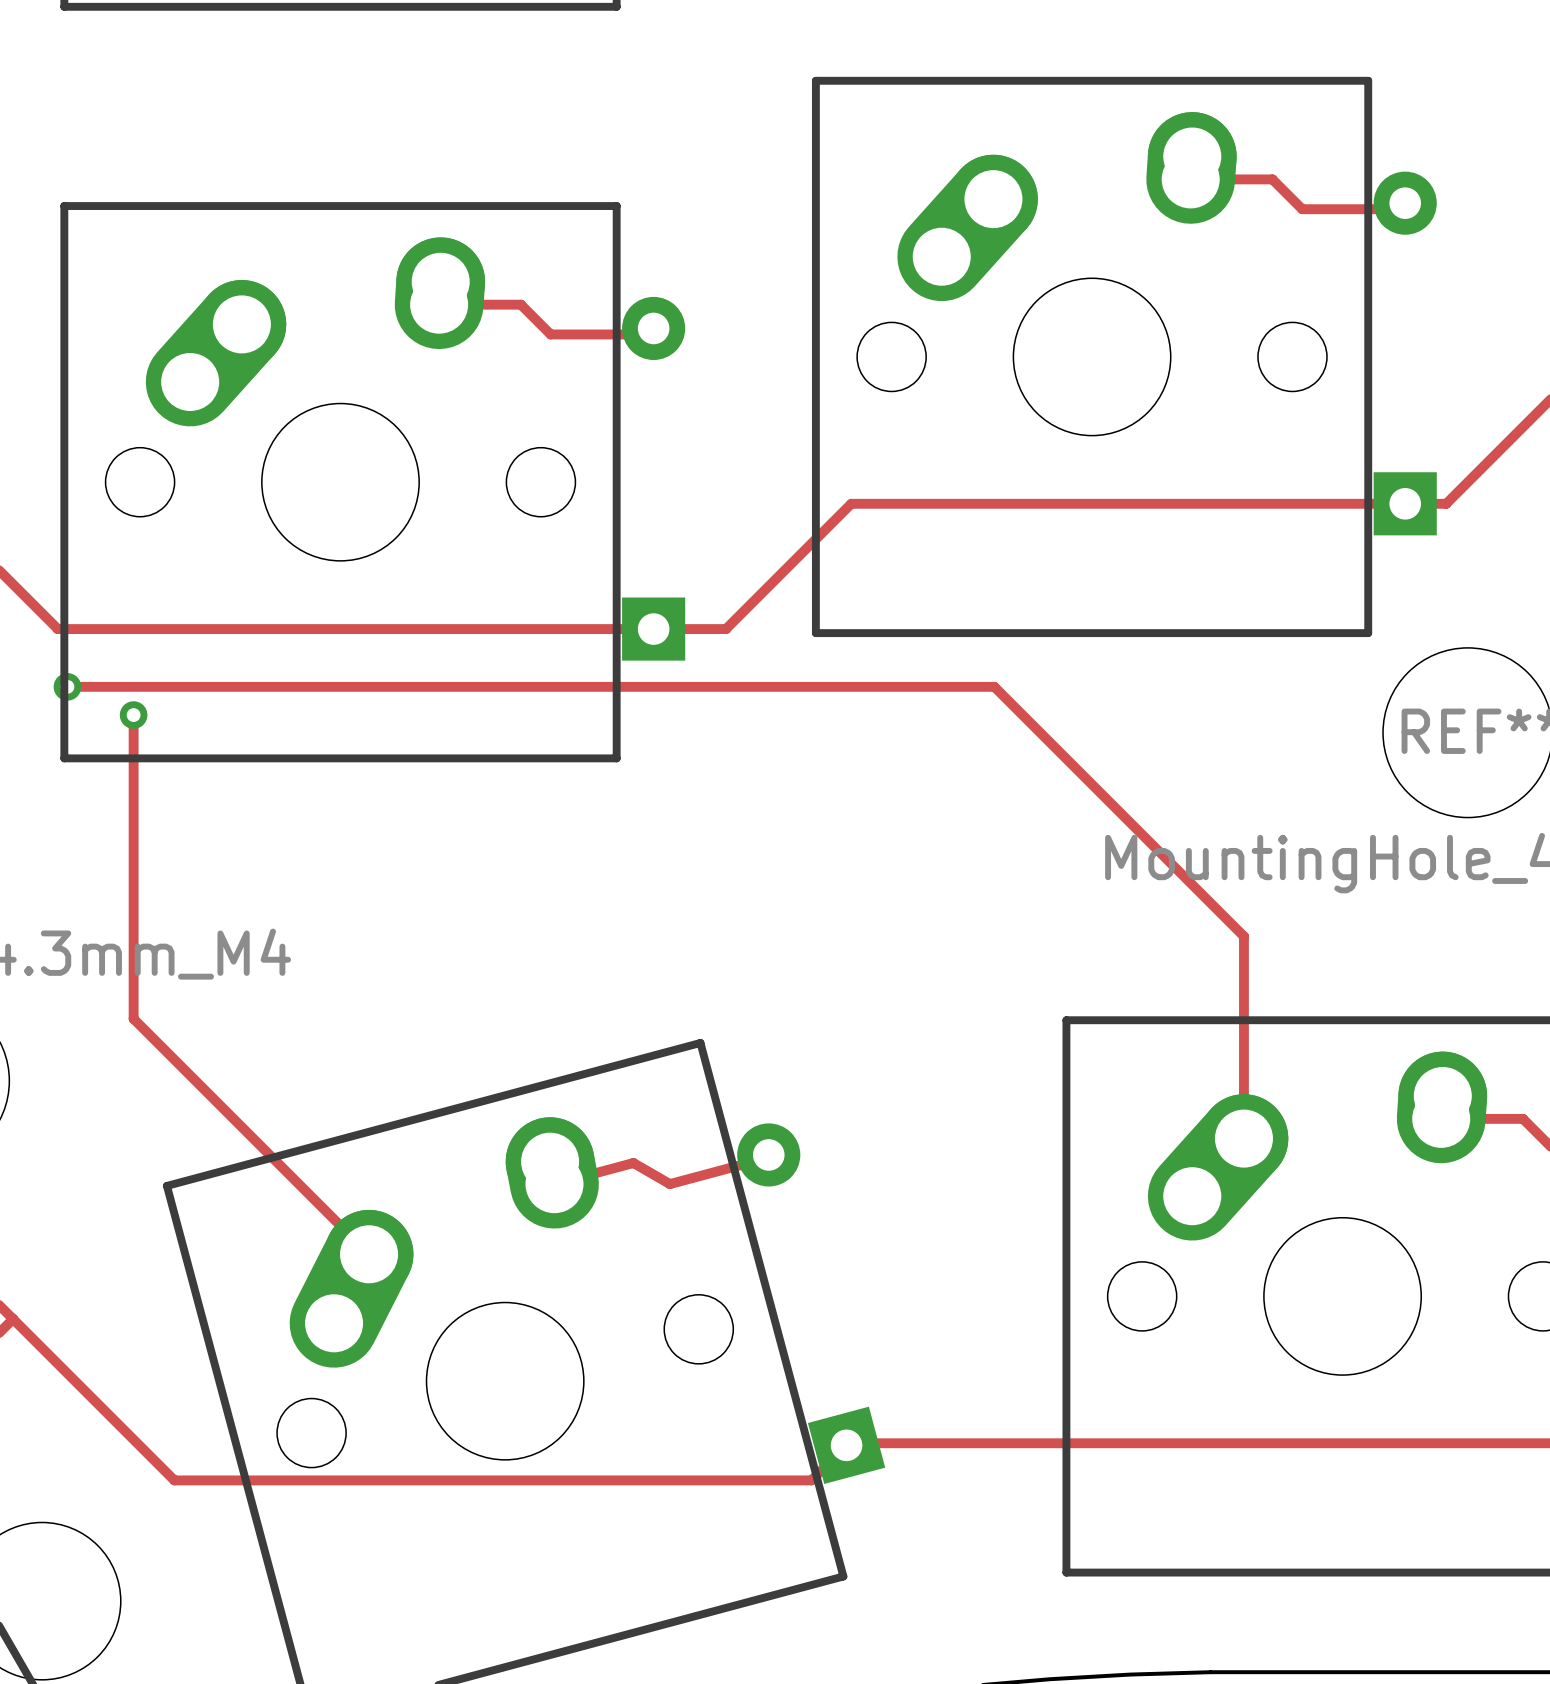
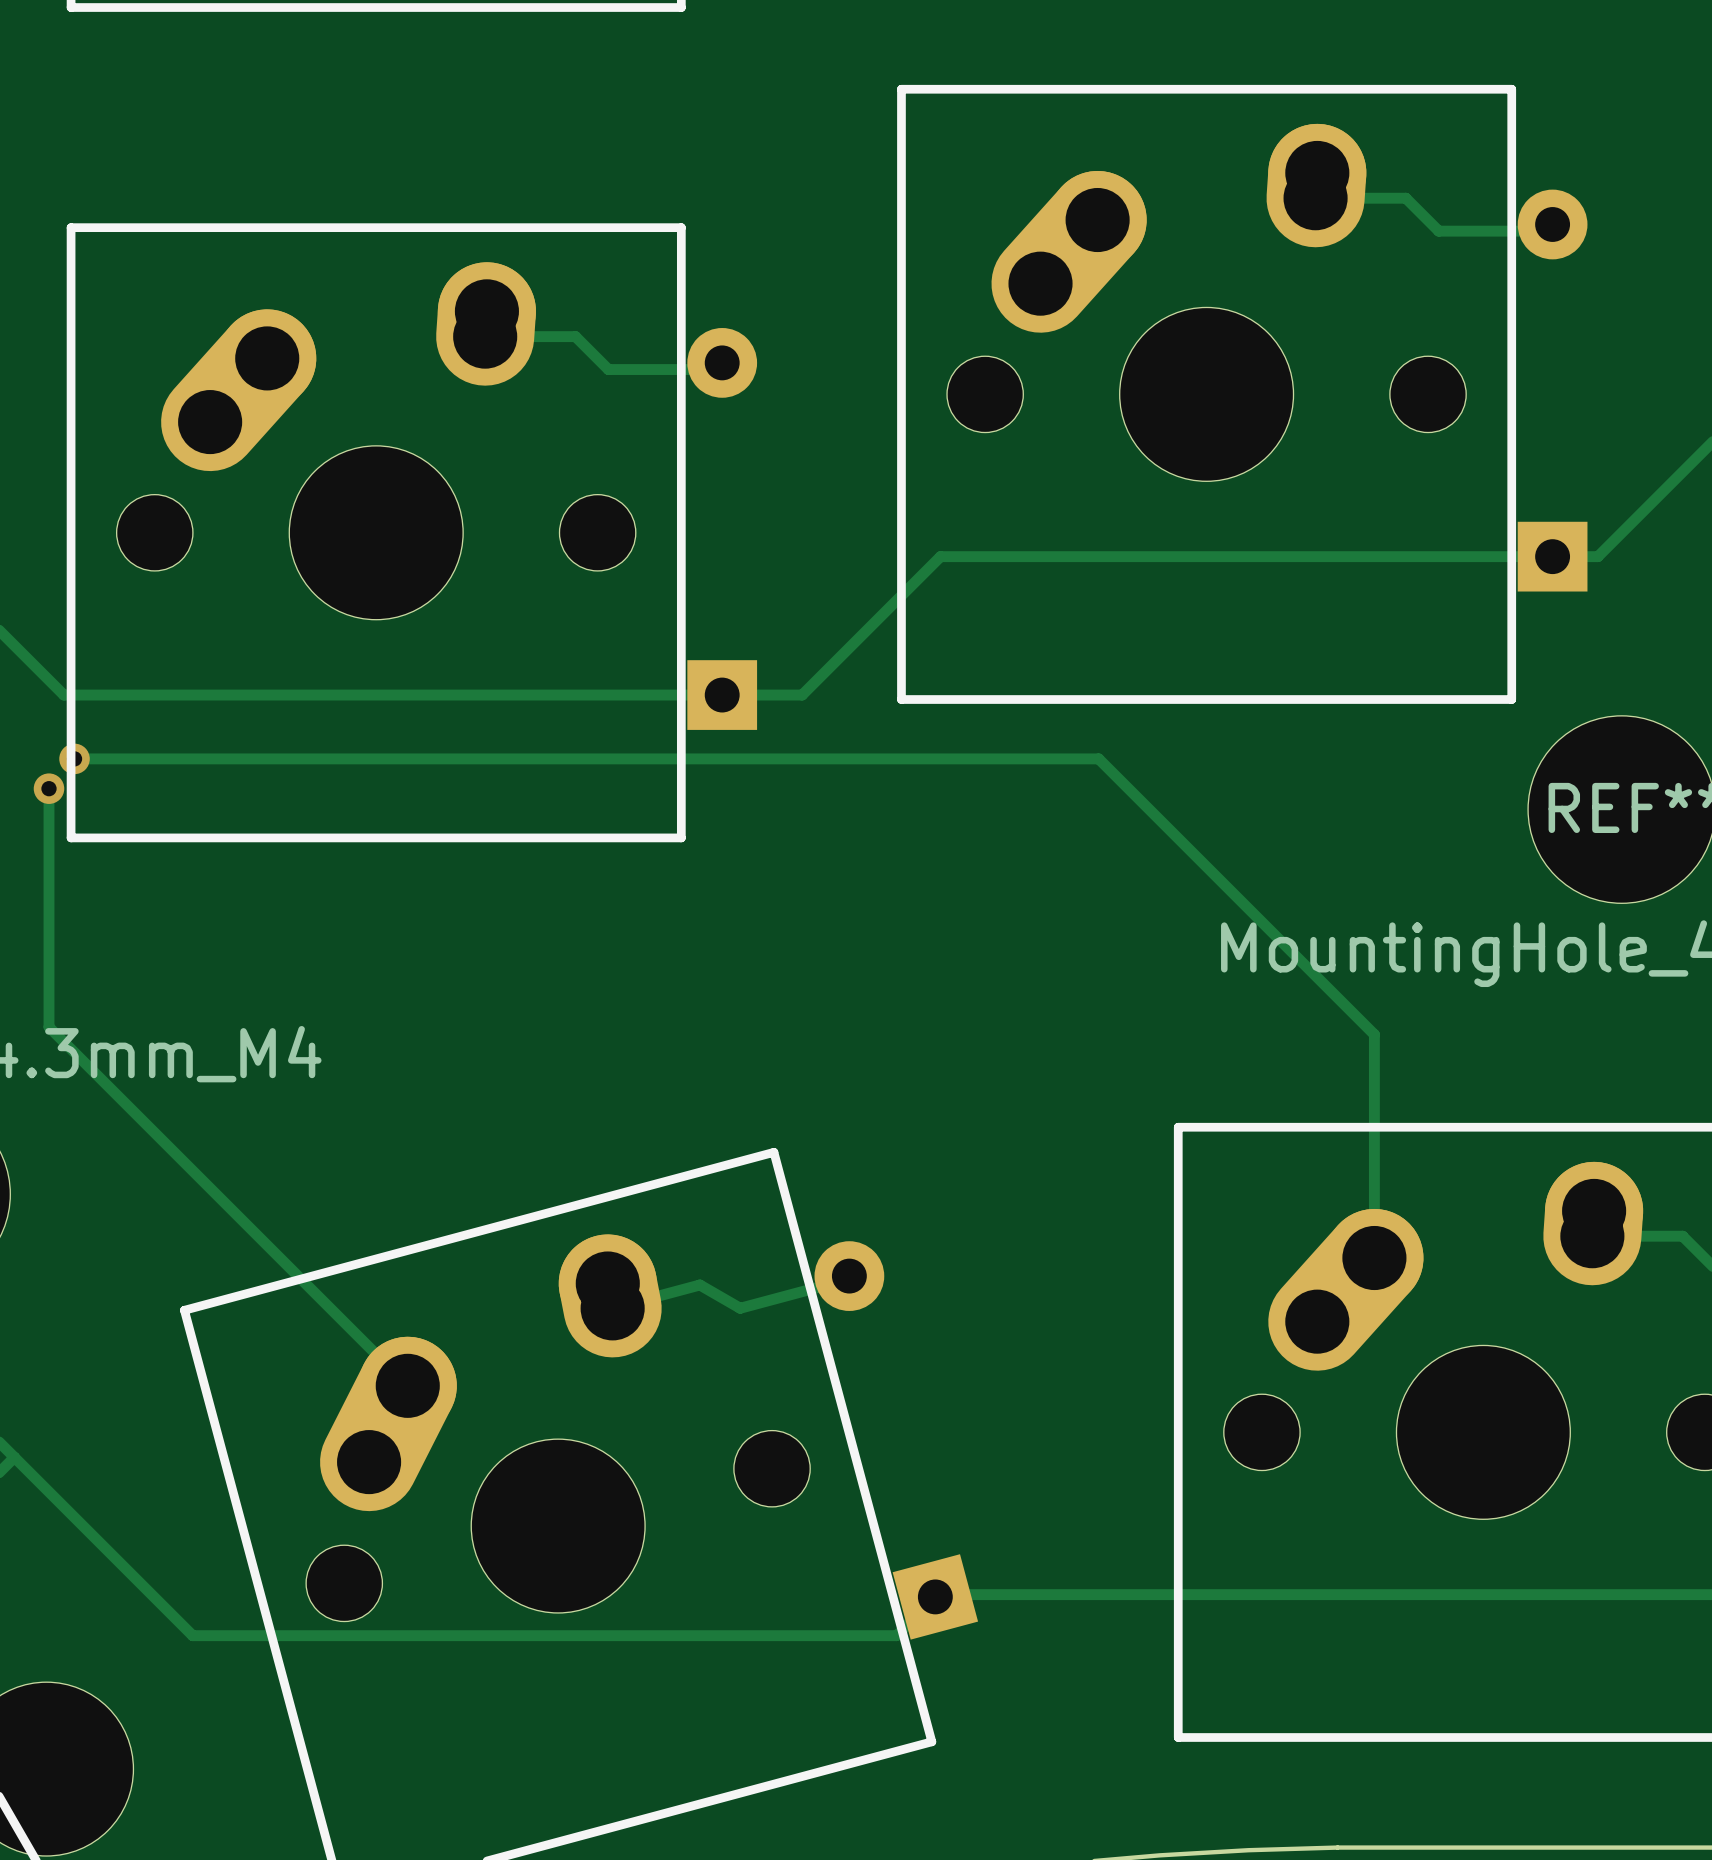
track: (133, 715) (133, 1018) -> (48, 788) (48, 1027) (147, 1125)
via position: (133, 715) -> (48, 788)

